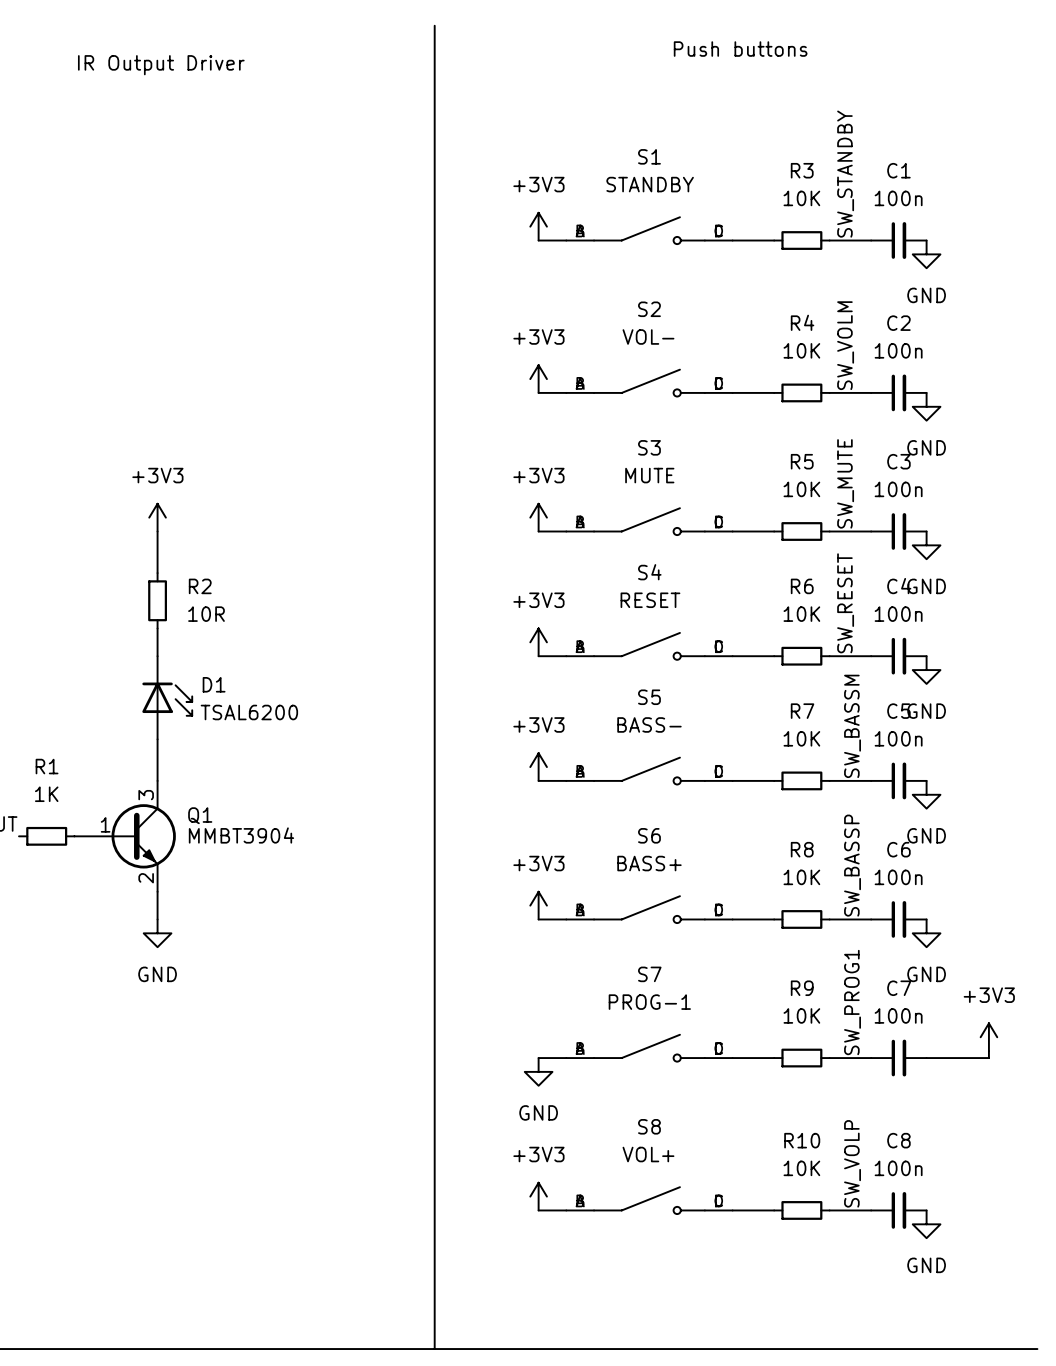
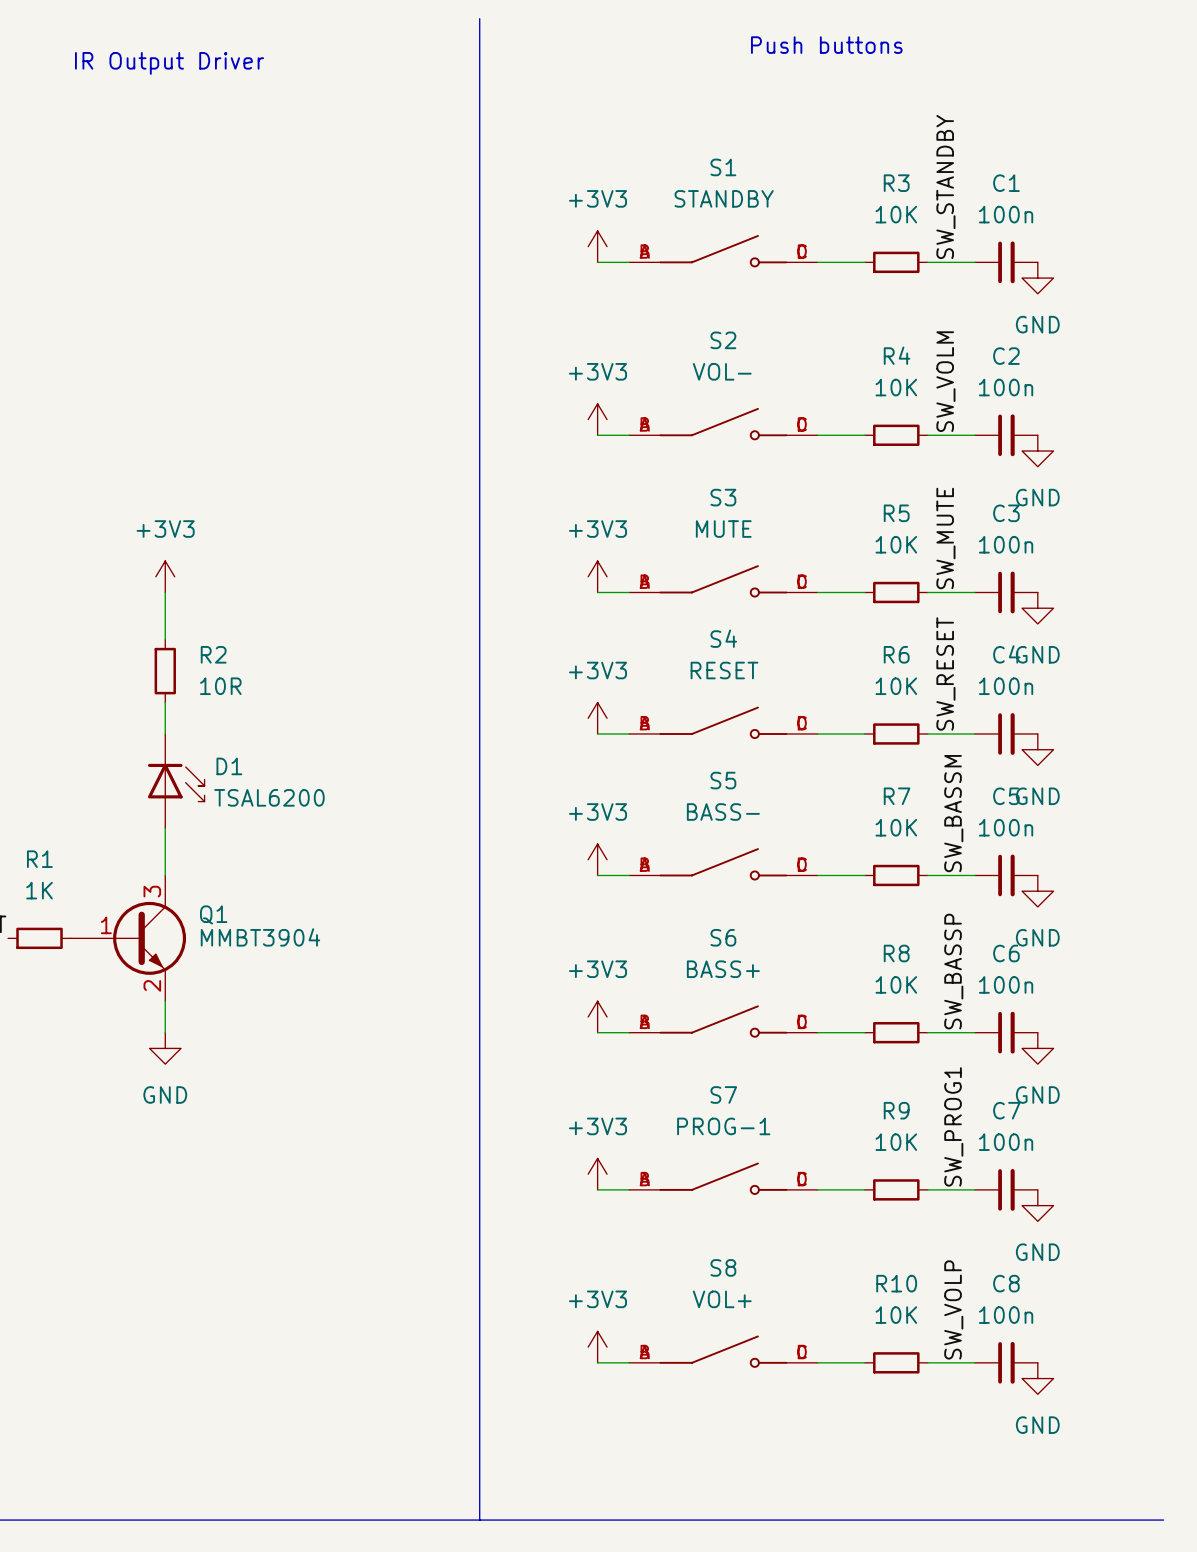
power symbol: +3V3 (988, 1037) -> none
power symbol: none -> +3V3 (597, 1174)
wire: (988, 1051) (988, 1058) (926, 1058) -> none
power symbol: GND (538, 1071) -> none
power symbol: none -> GND (1037, 1205)

